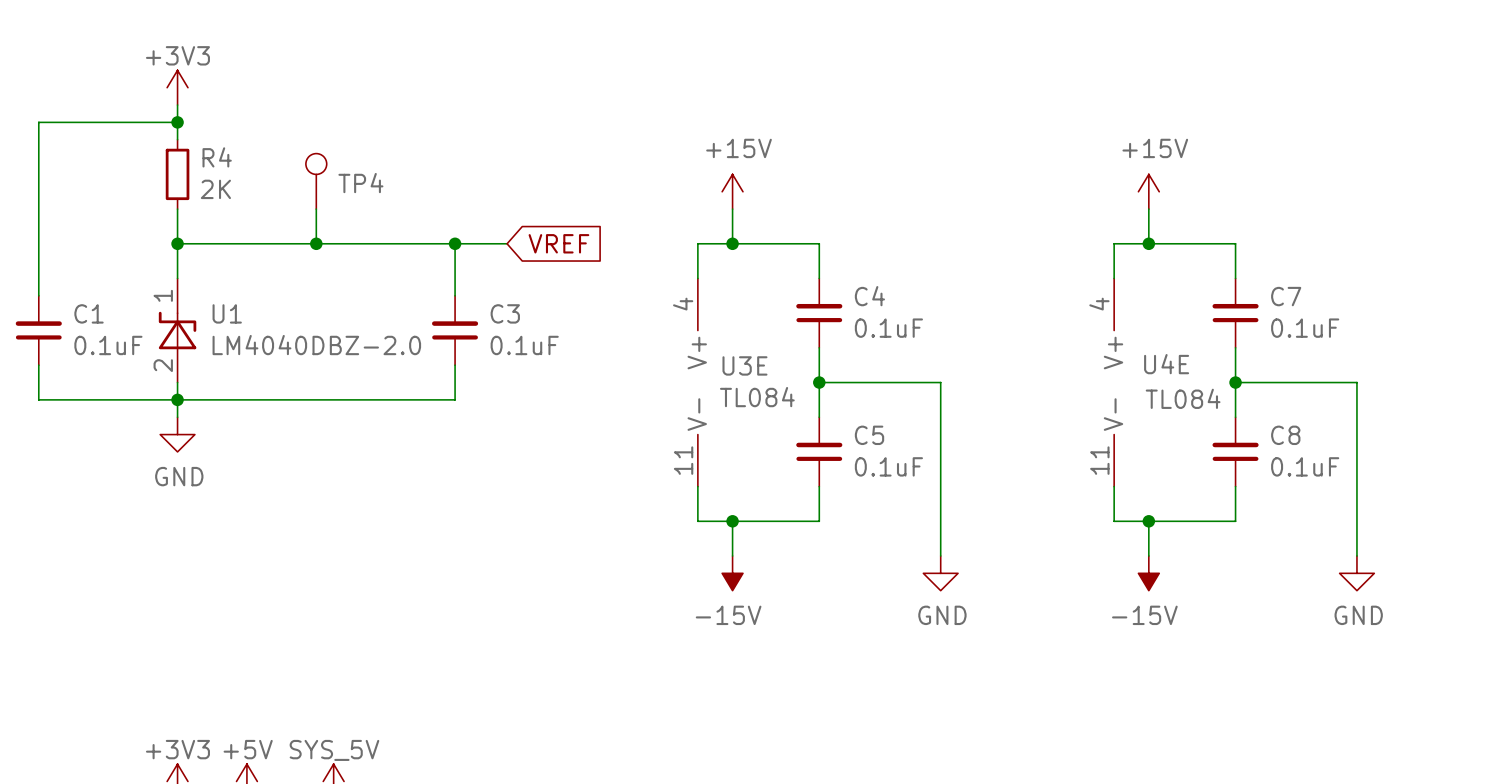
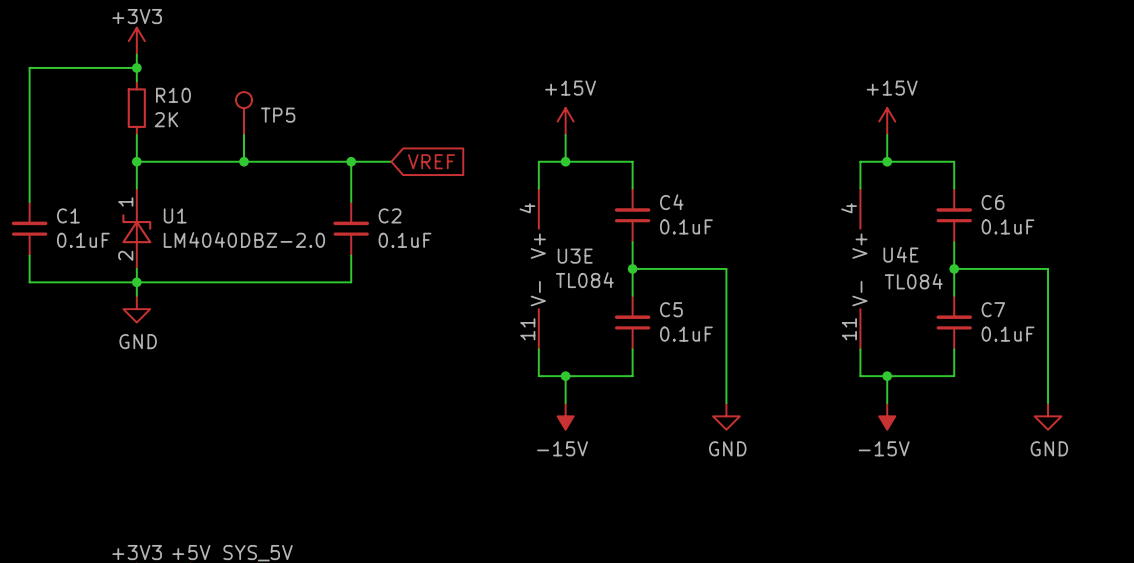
R4 name: R4 (217, 157) -> R10 (173, 95)
TP4 name: TP4 (360, 183) -> TP5 (278, 115)
C7 name: C7 (1286, 296) -> C6 (993, 202)
C3 name: C3 (505, 313) -> C2 (390, 215)
C8 name: C8 (1285, 435) -> C7 (993, 309)

